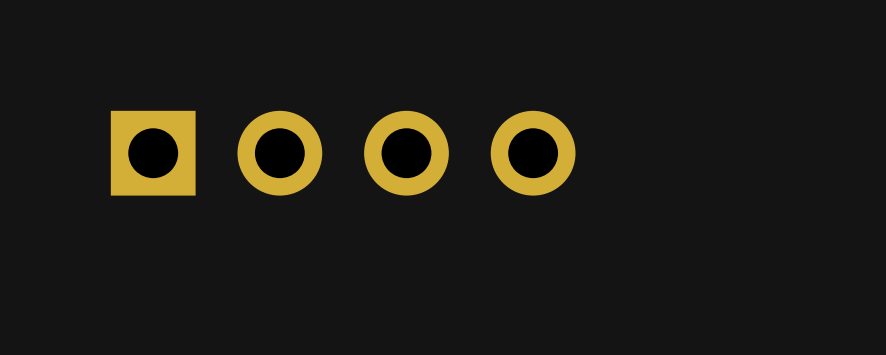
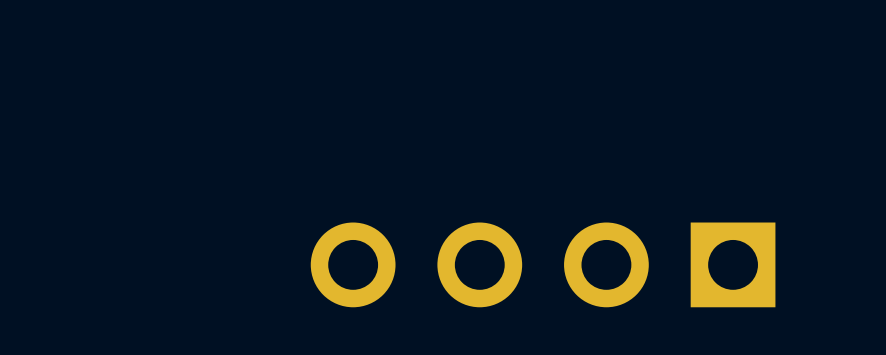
part rotation: 0° (343, 153) -> 180° (543, 264)

